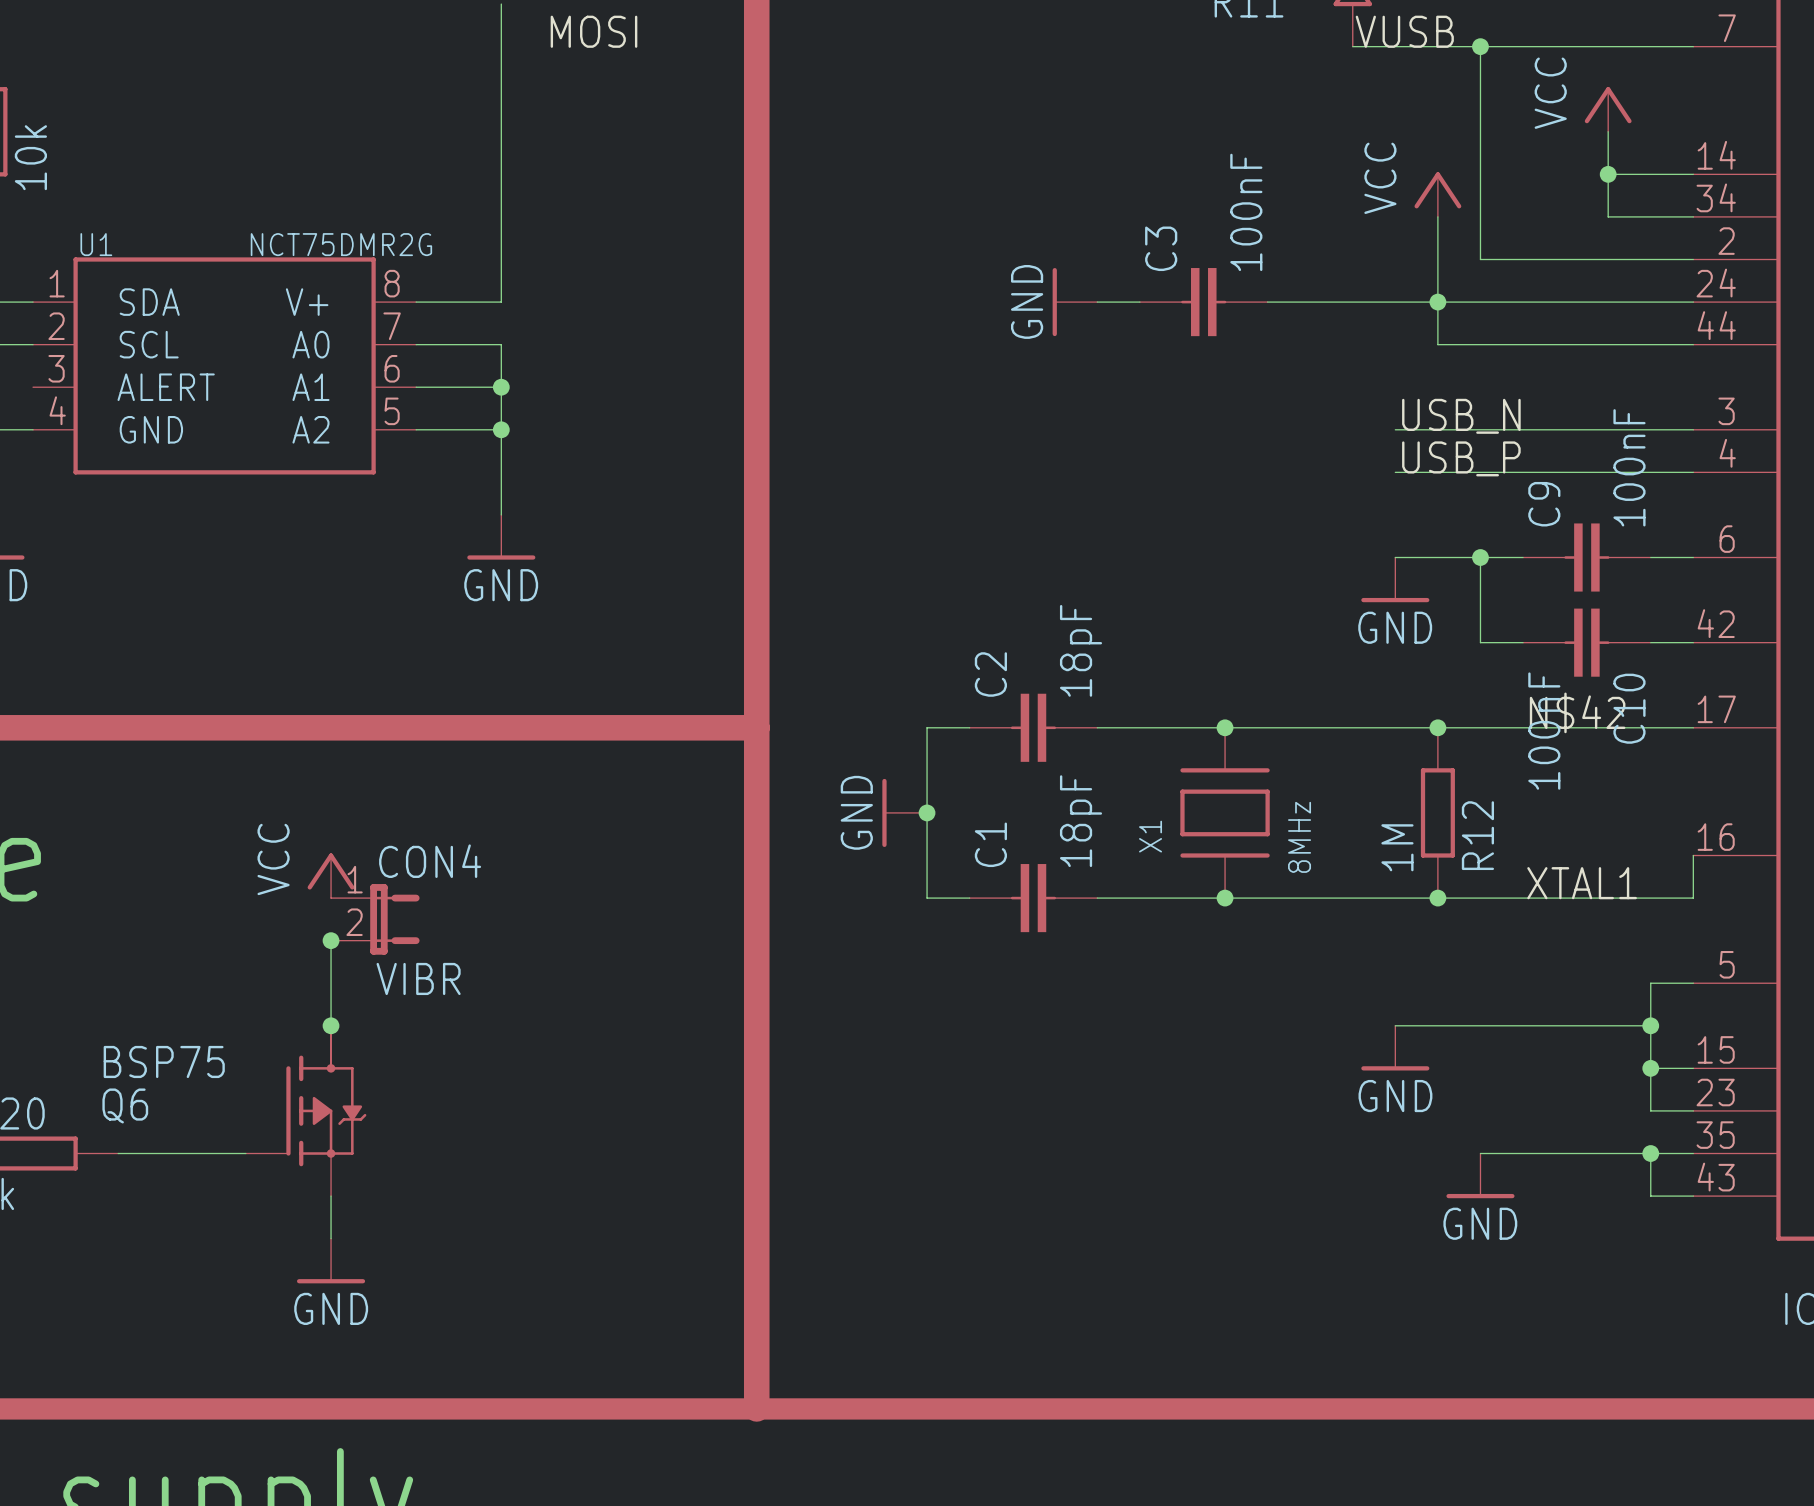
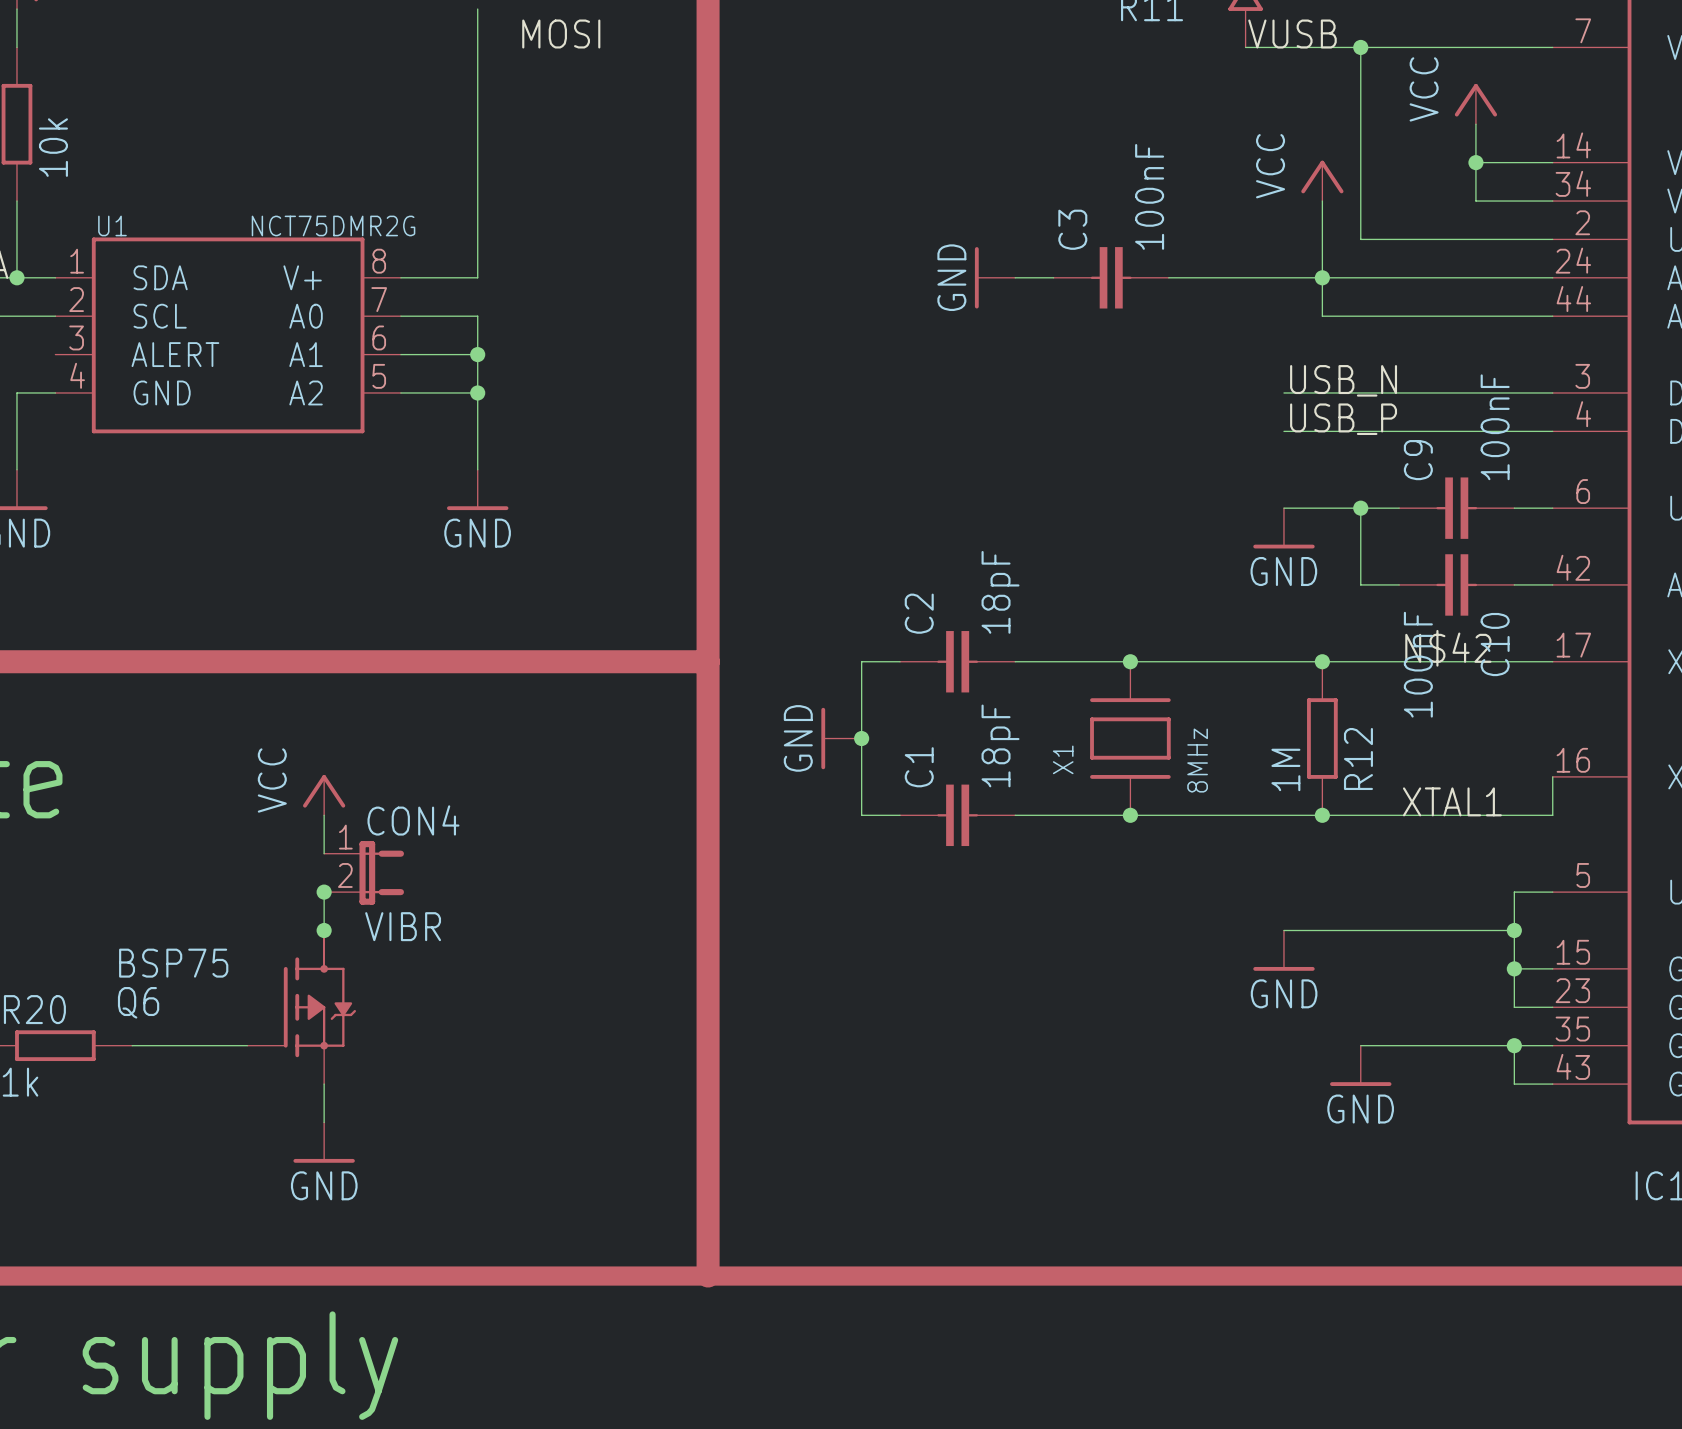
CON4 position: (375, 919) -> (364, 872)
wire: (331, 940) (331, 983) -> (324, 853) (324, 815)
junction position: (331, 940) -> (324, 892)

